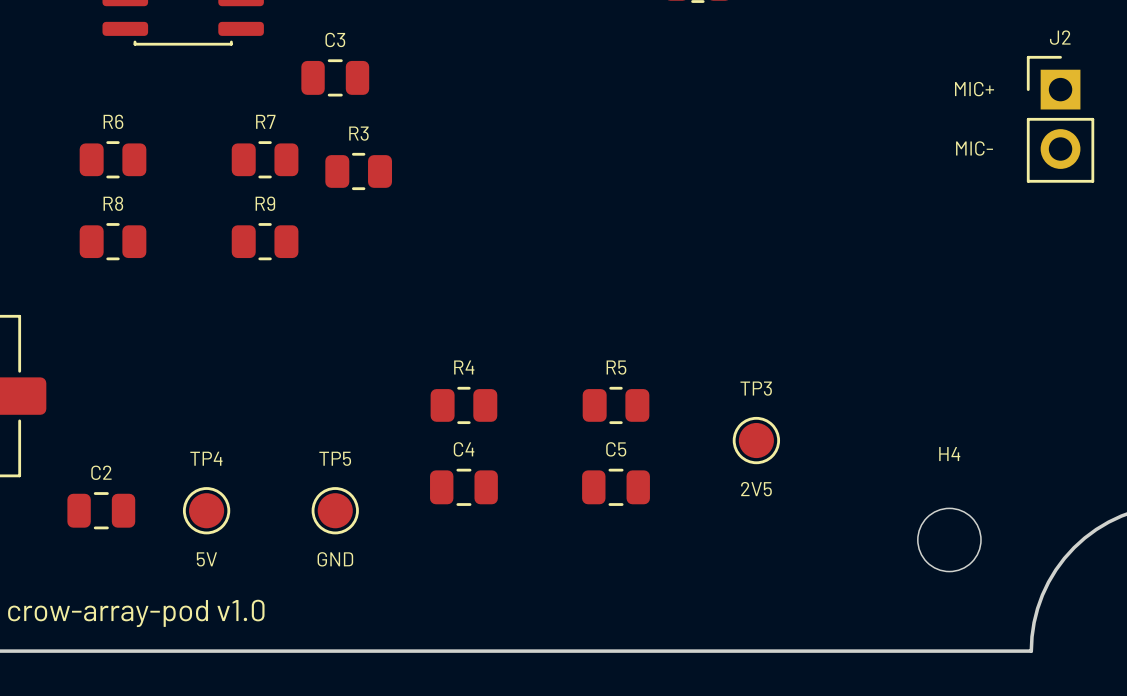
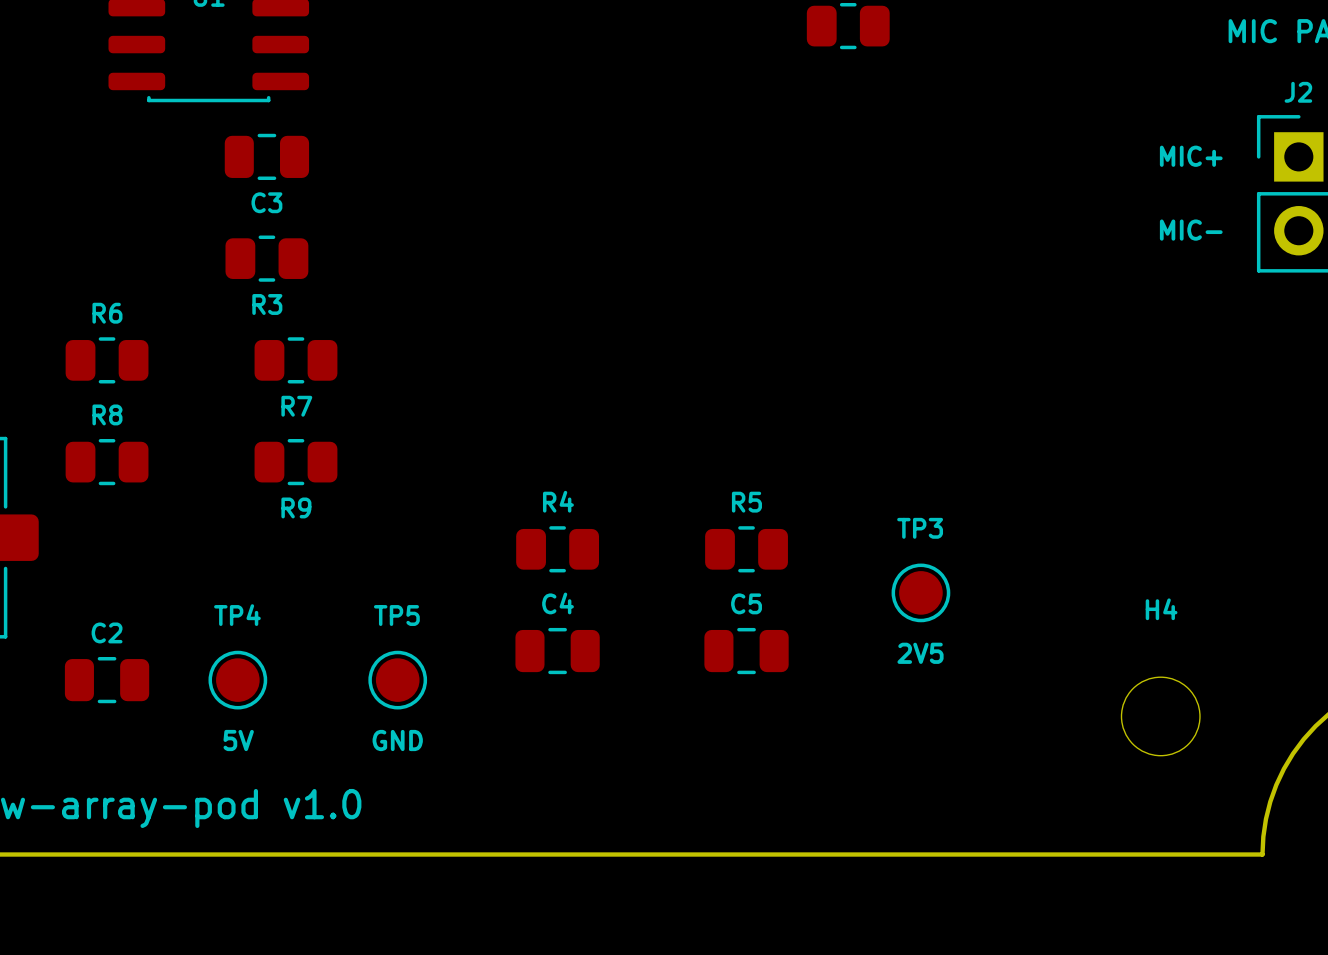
C3 name position: C3 (335, 39) -> C3 (266, 202)
C3 position: (335, 77) -> (266, 156)
R7 name position: R7 (265, 121) -> R7 (296, 406)
R3 name position: R3 (358, 133) -> R3 (267, 304)
R6 position: (113, 159) -> (107, 360)
R7 position: (265, 159) -> (295, 360)
R3 position: (358, 171) -> (266, 258)
R9 name position: R9 (265, 203) -> R9 (296, 507)
R8 position: (113, 241) -> (107, 462)
R9 position: (265, 241) -> (295, 462)

